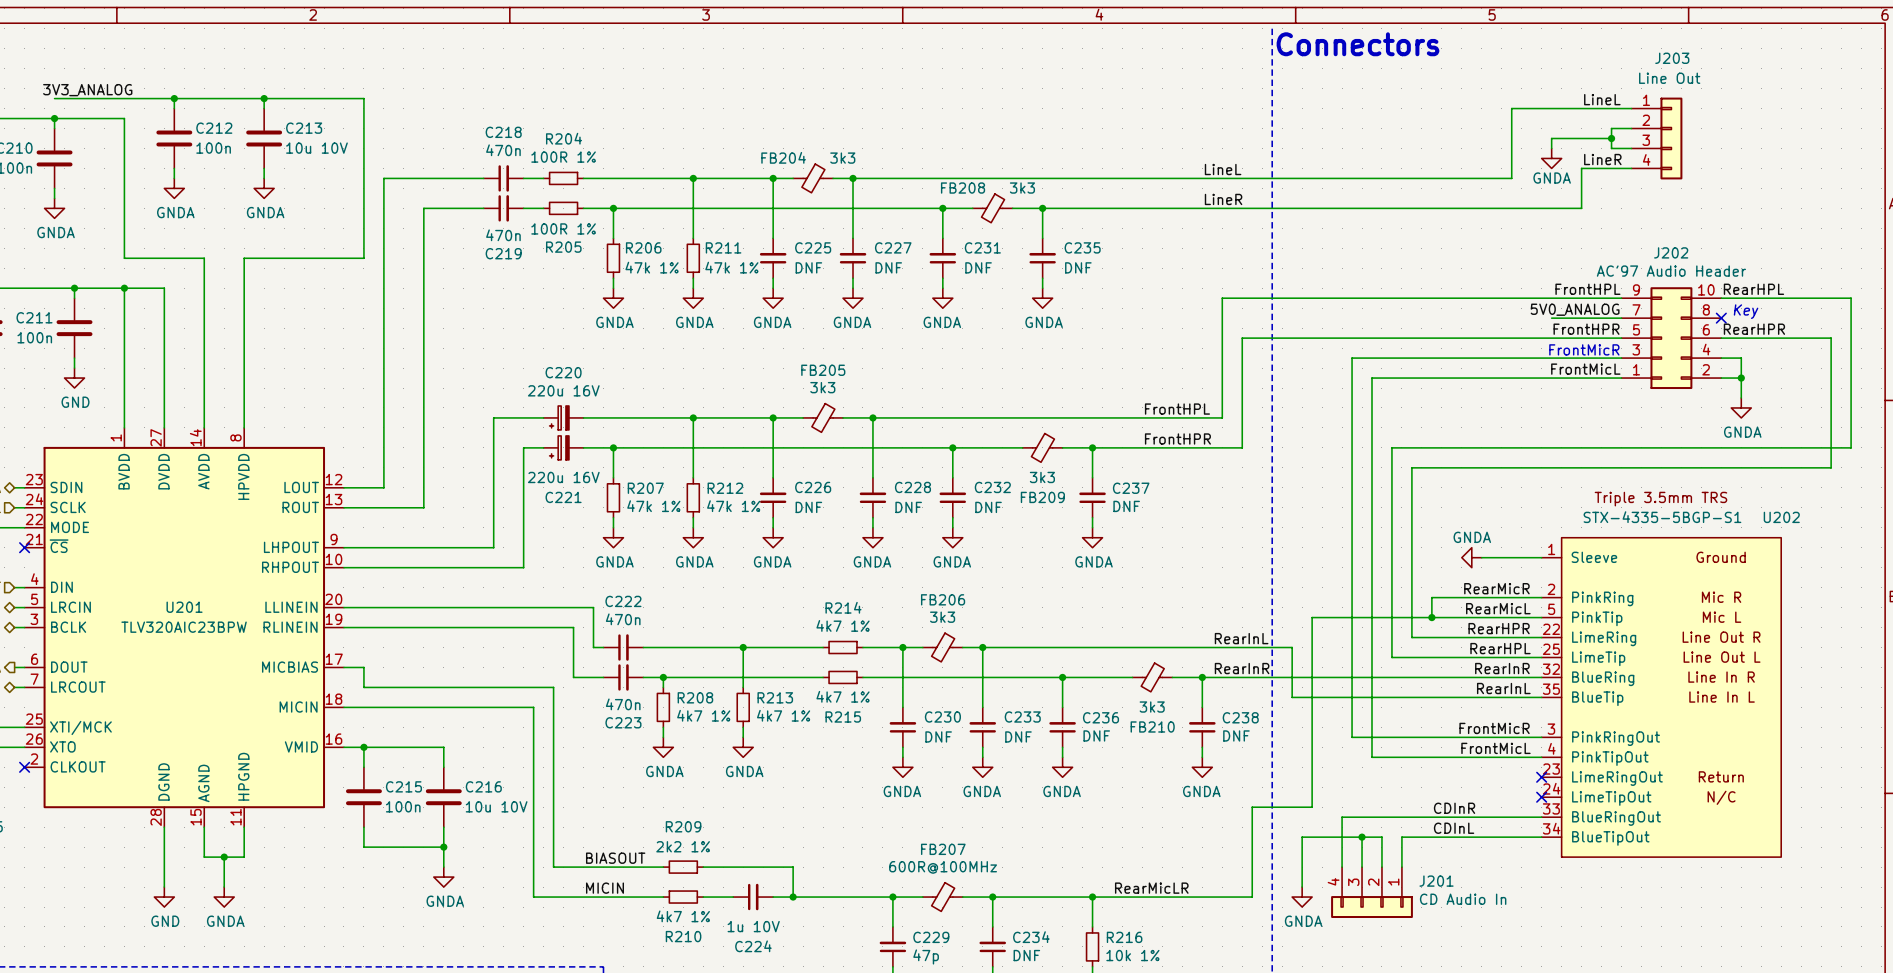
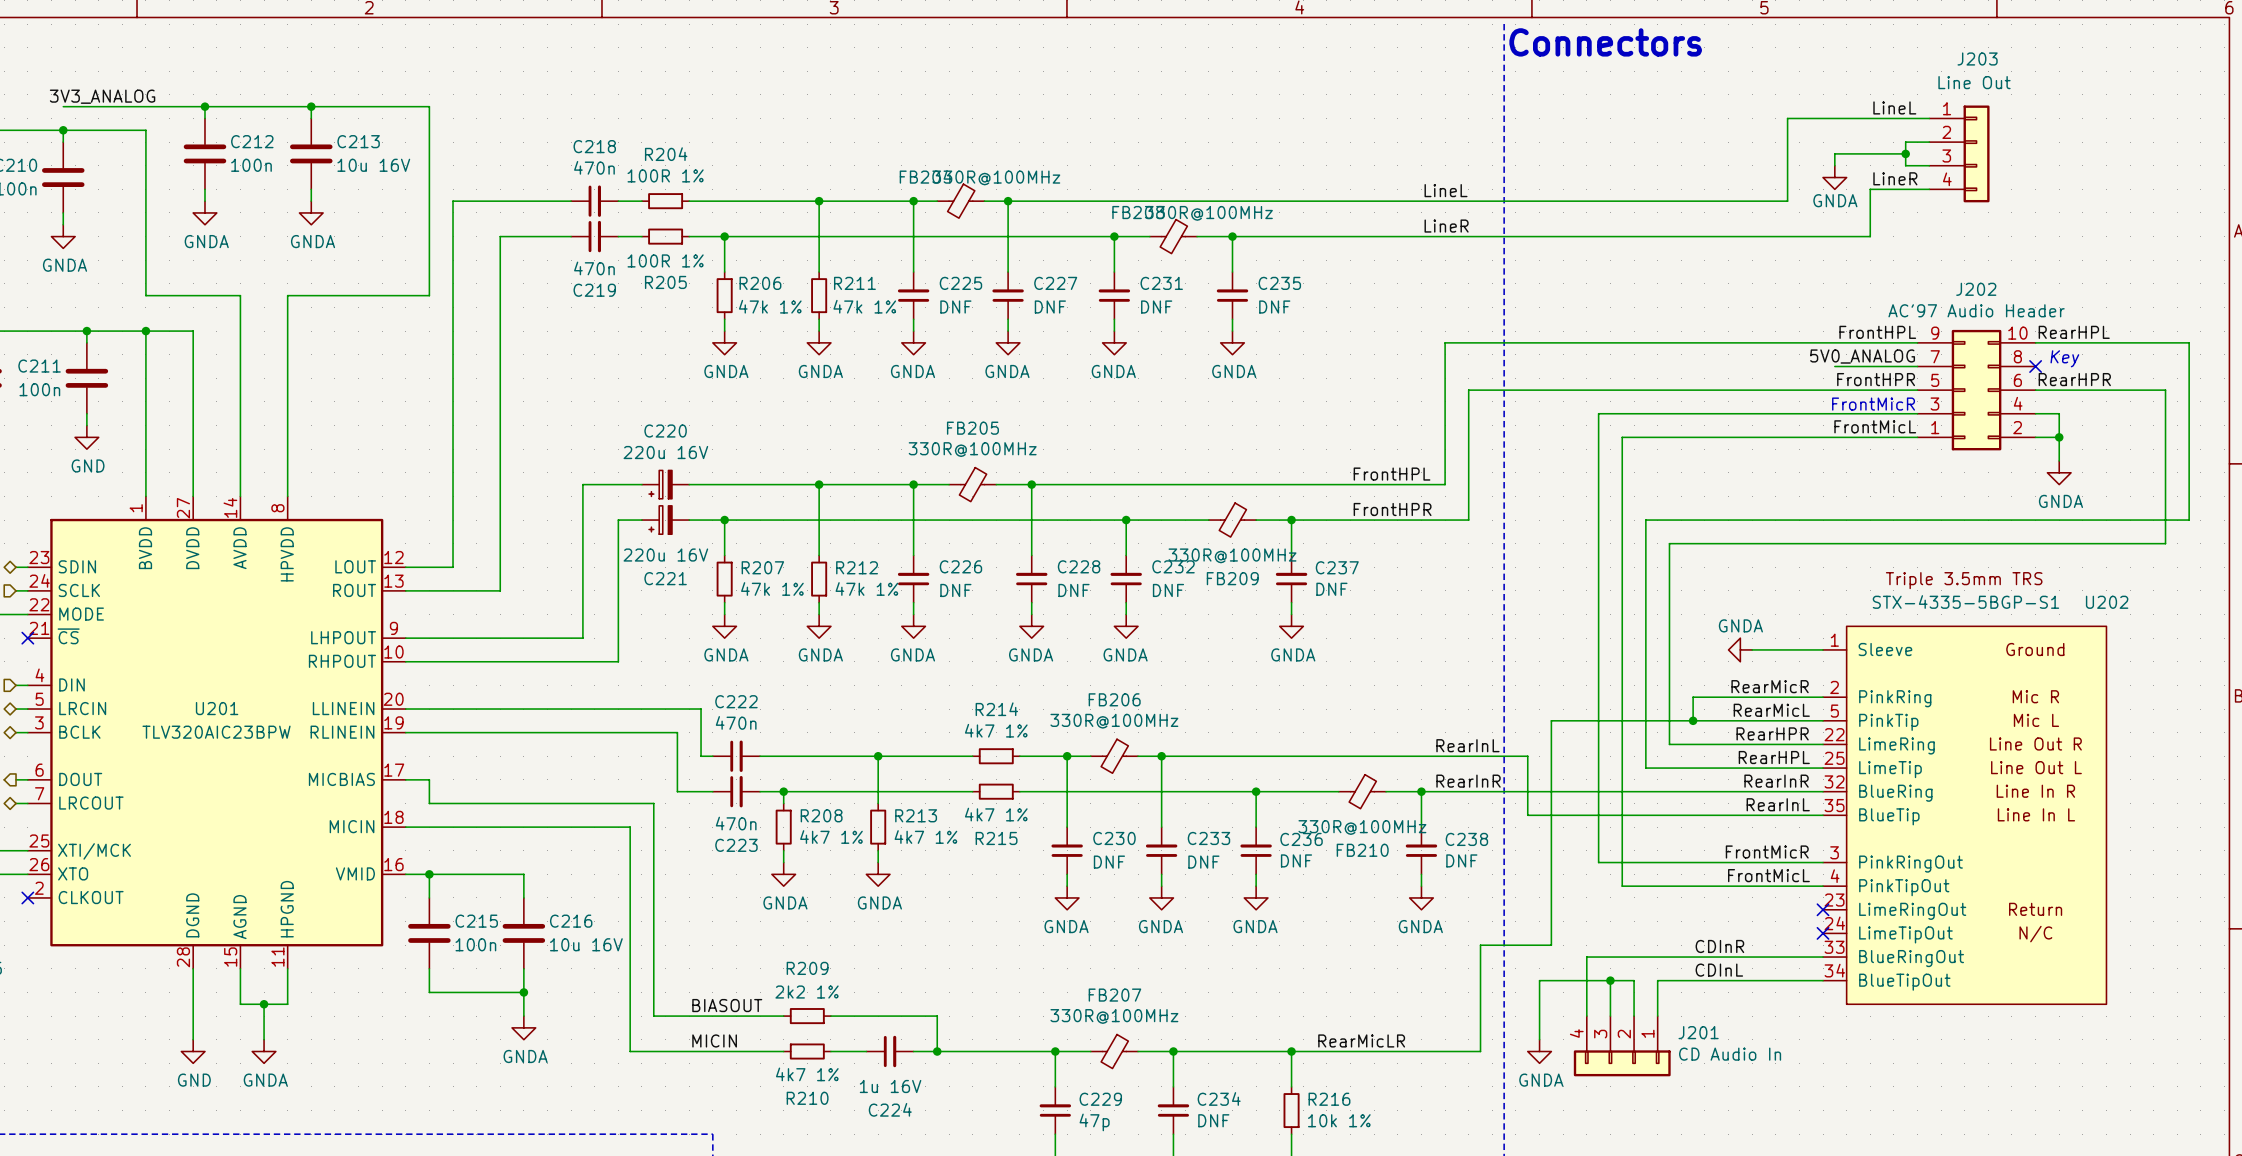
C213 value: 10u 10V (316, 148) -> 10u 16V (373, 165)
FB204 value: 3k3 (842, 158) -> 330R@100MHz (996, 177)
FB208 value: 3k3 (1022, 188) -> 330R@100MHz (1208, 213)
FB205 value: 3k3 (822, 387) -> 330R@100MHz (972, 449)
FB209 value: 3k3 (1042, 477) -> 330R@100MHz (1232, 555)
FB206 value: 3k3 (942, 617) -> 330R@100MHz (1114, 721)
FB210 value: 3k3 (1152, 707) -> 330R@100MHz (1362, 827)
C216 value: 10u 10V (496, 806) -> 10u 16V (586, 944)
FB207 value: 600R@100MHz (943, 867) -> 330R@100MHz (1114, 1016)
C224 value: 1u 10V (753, 926) -> 1u 16V (890, 1086)

